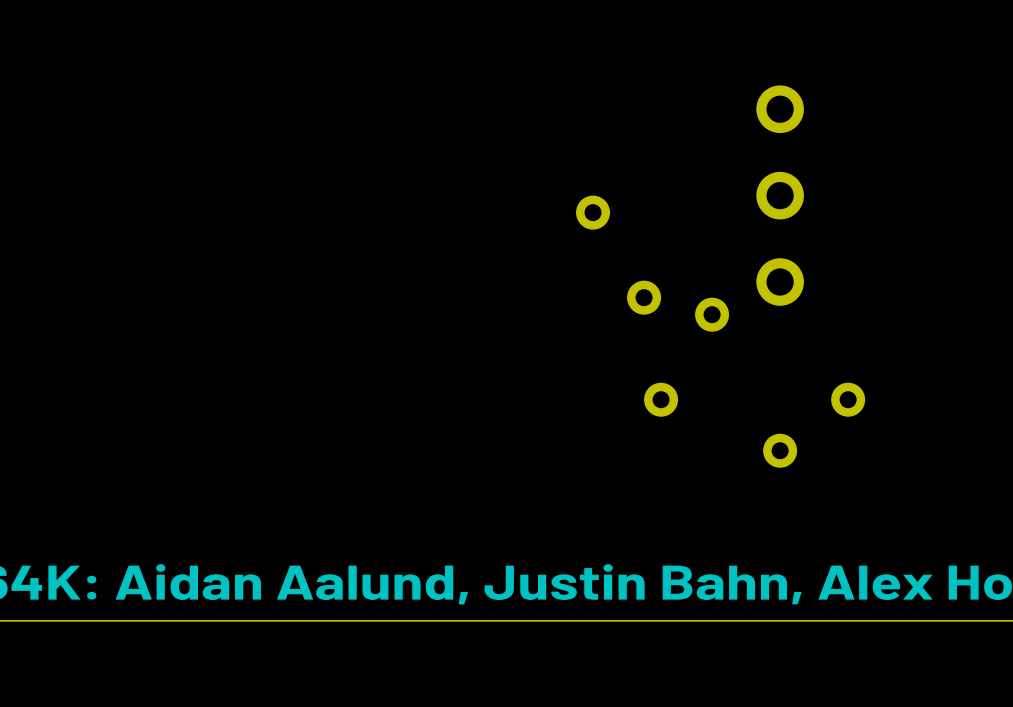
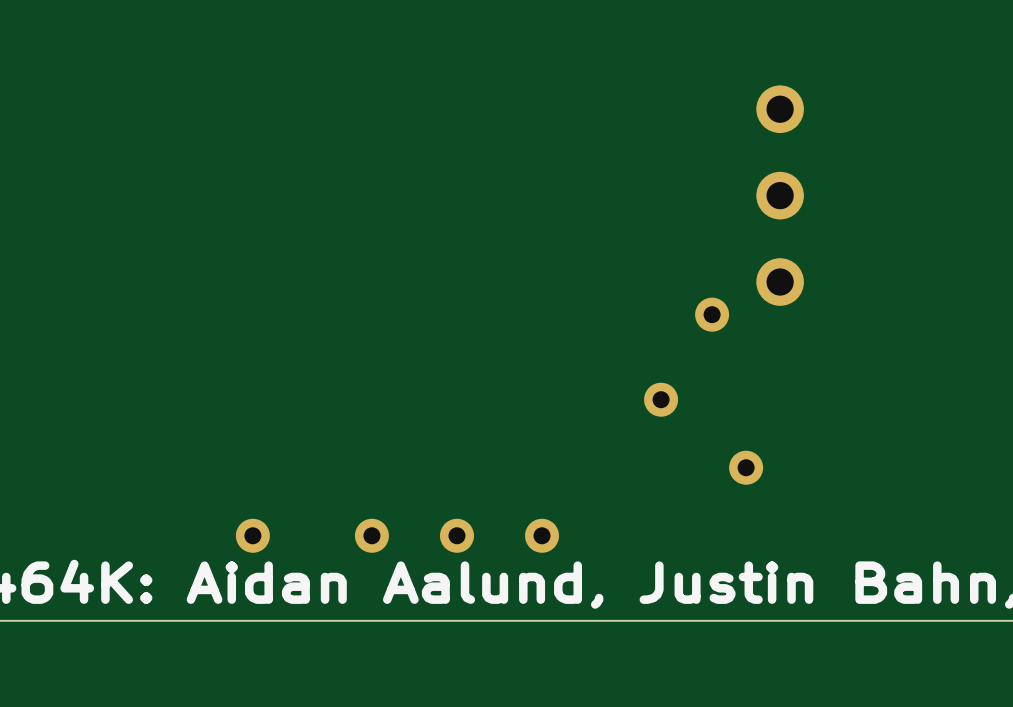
part: (593, 212) -> none
part: (644, 297) -> none
part: (848, 399) -> none
part position: (780, 450) -> (746, 467)
part: none -> (252, 535)
part: none -> (371, 535)
part: none -> (456, 535)
part: none -> (542, 535)

